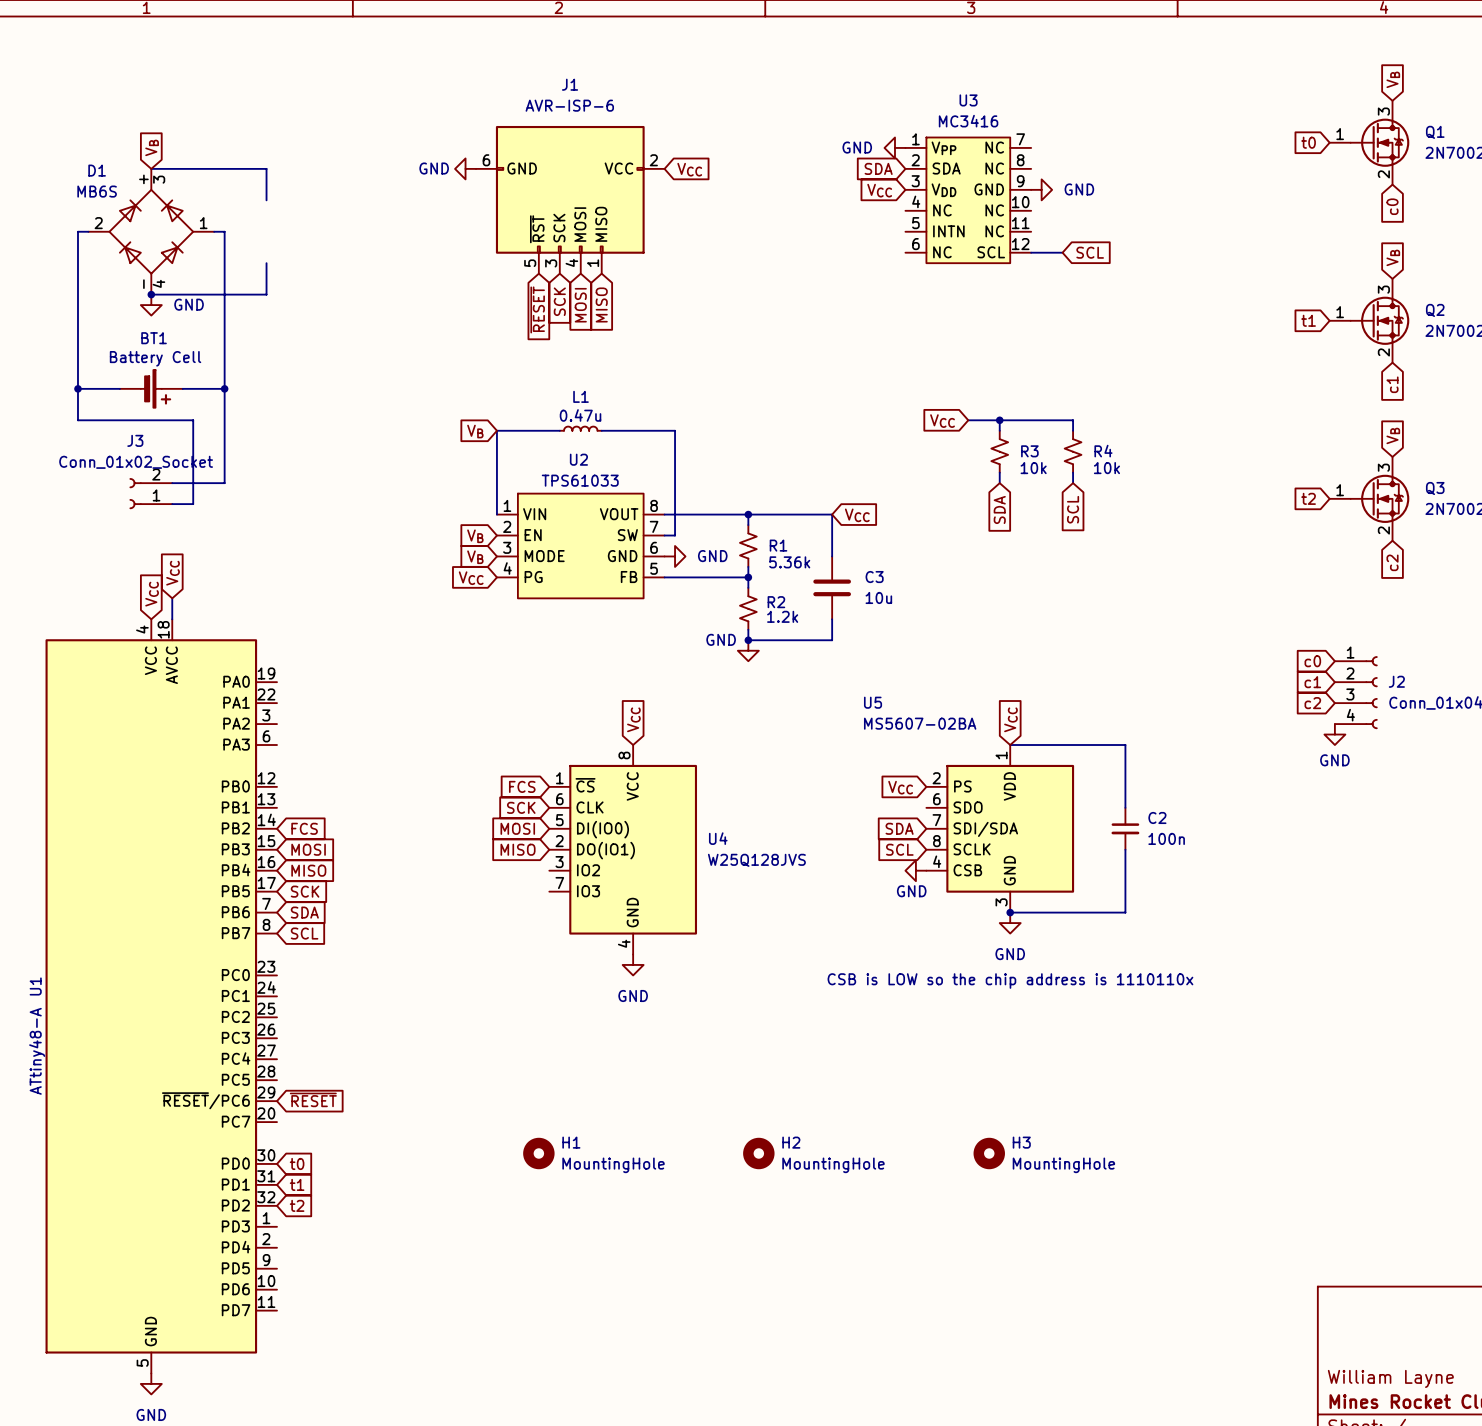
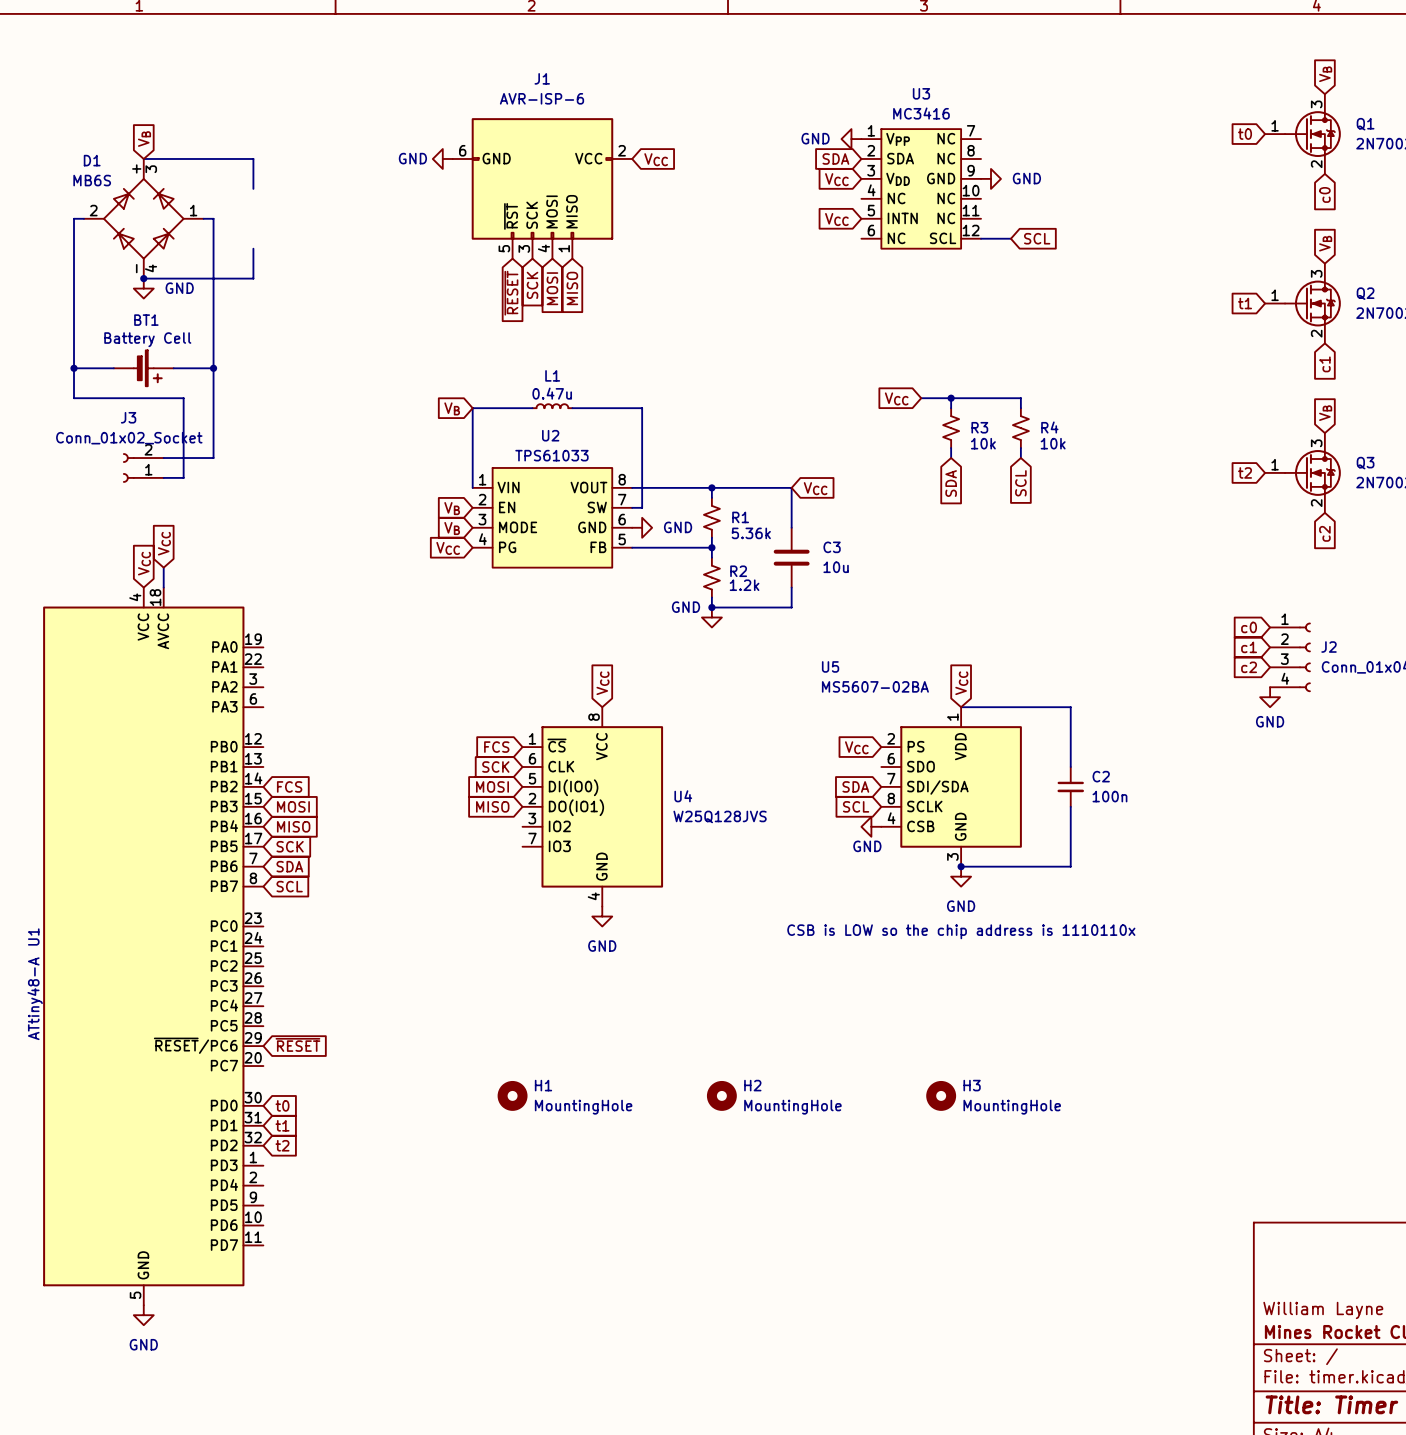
global label: none -> VCC (836, 219)

